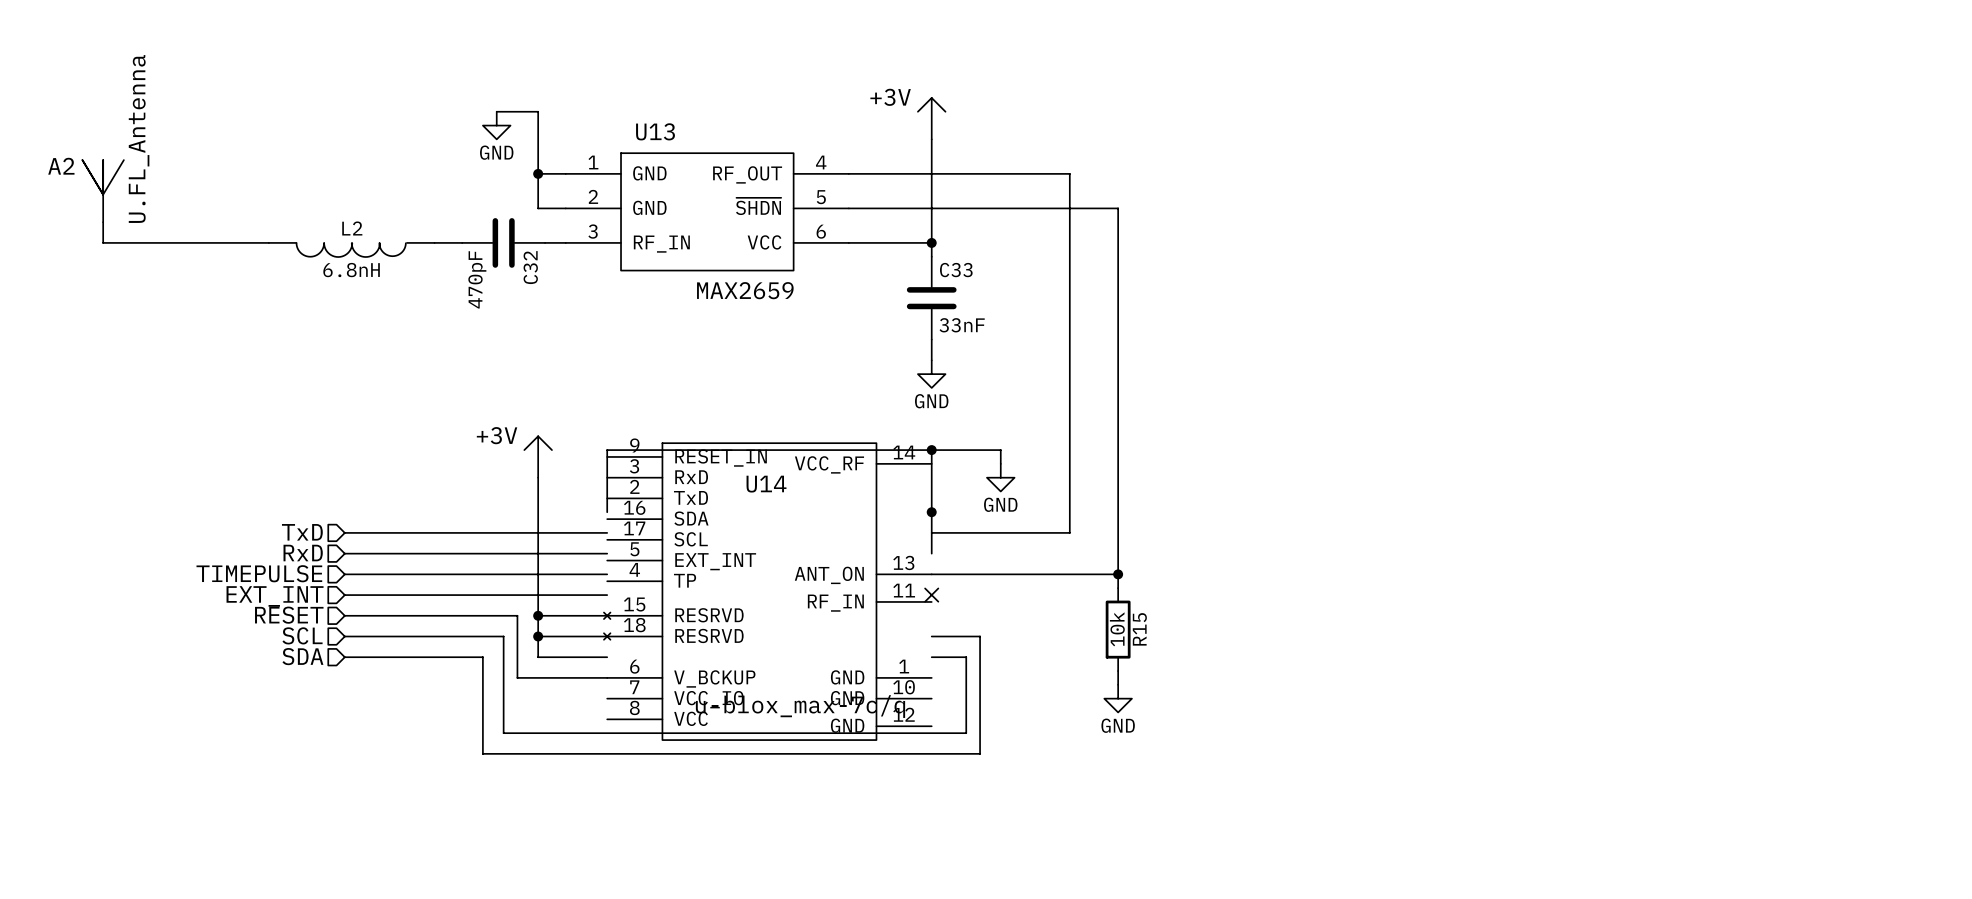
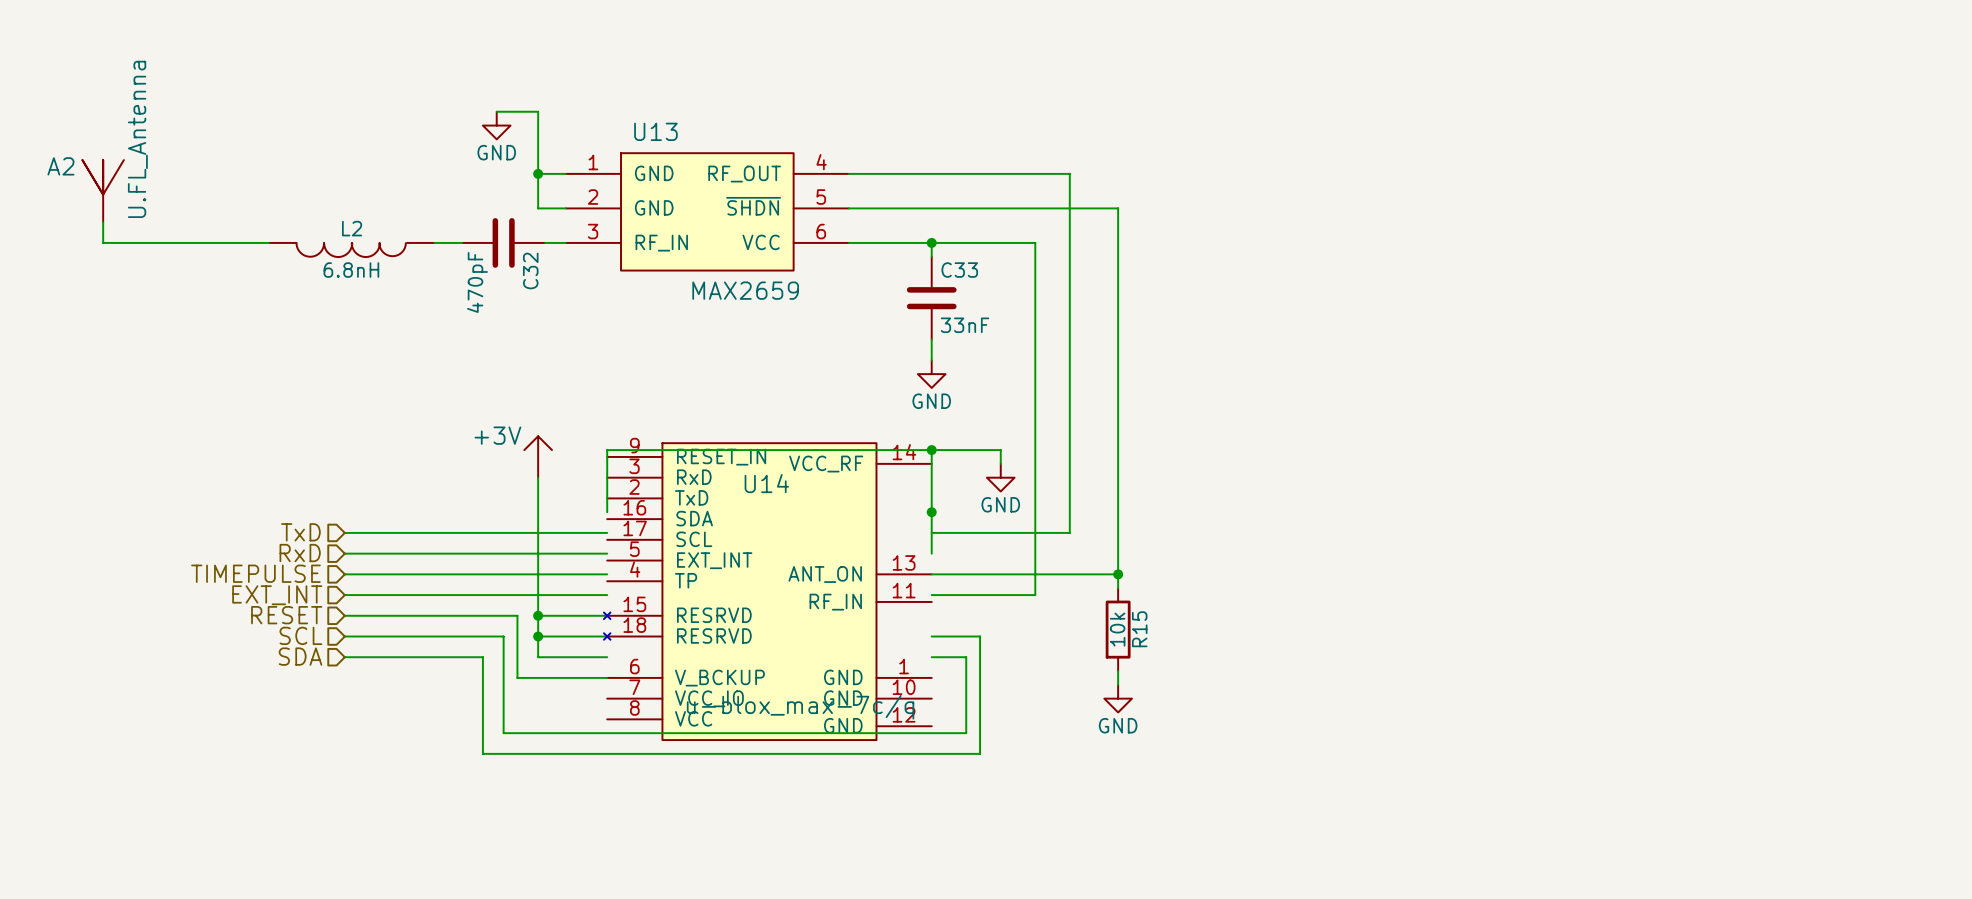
power symbol: +3V (931, 118) -> none
wire: (931, 139) (931, 242) -> (931, 595) (1035, 595) (1035, 242) (931, 242)
no-connect mark: (931, 595) -> none

